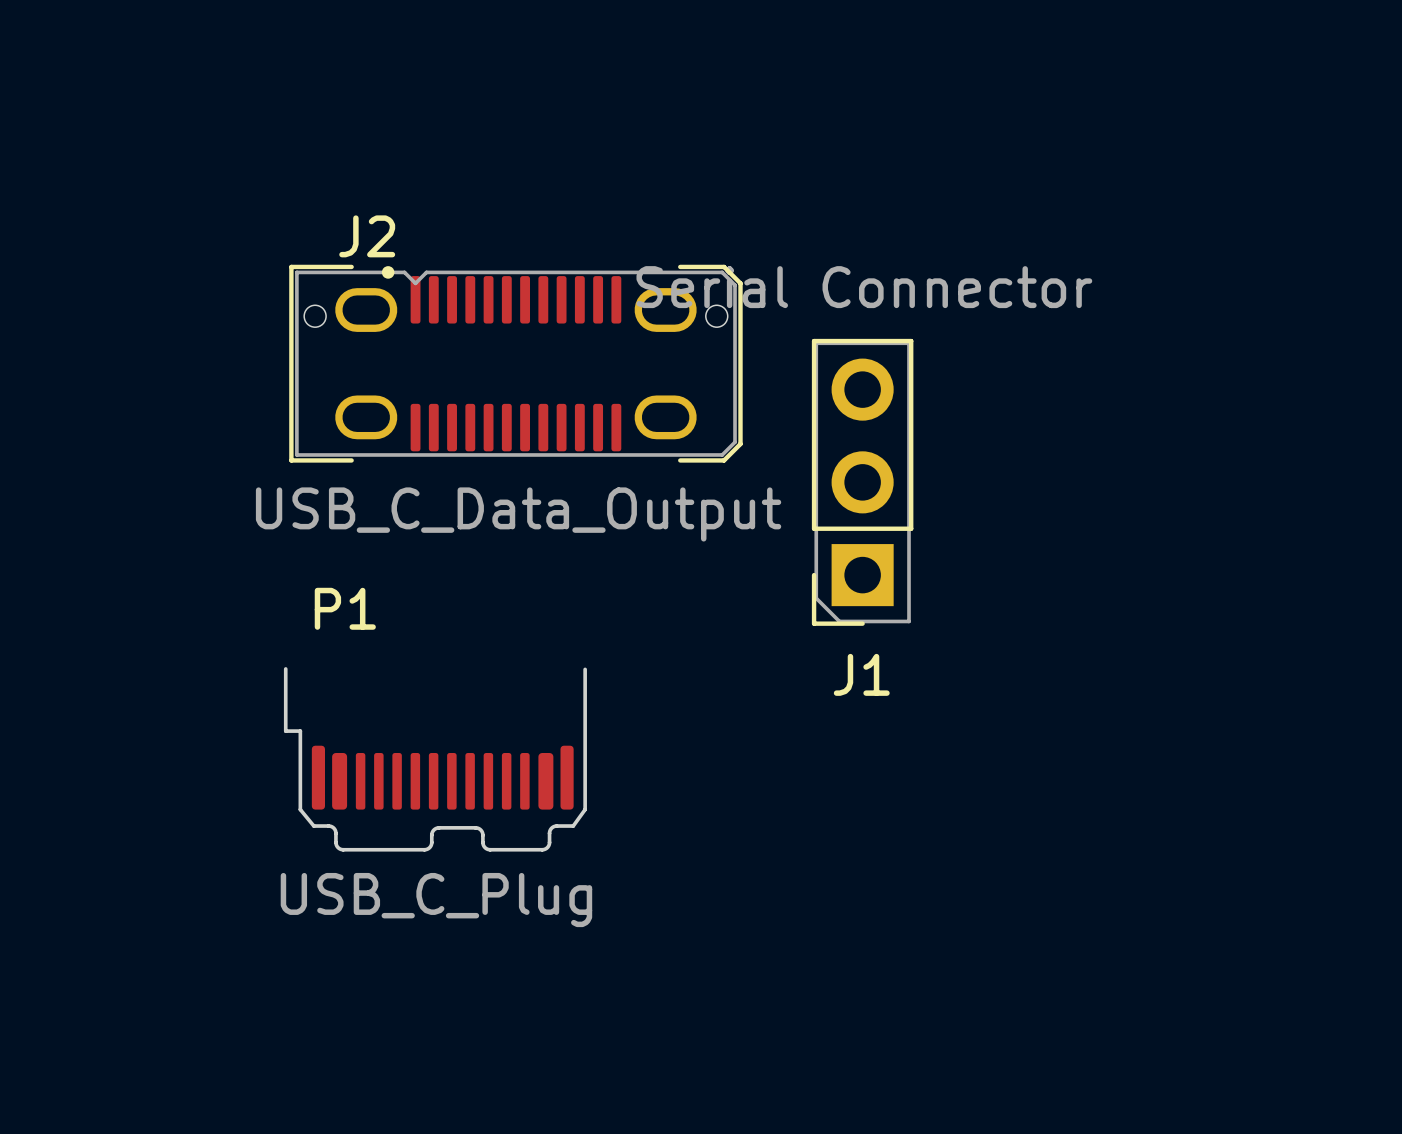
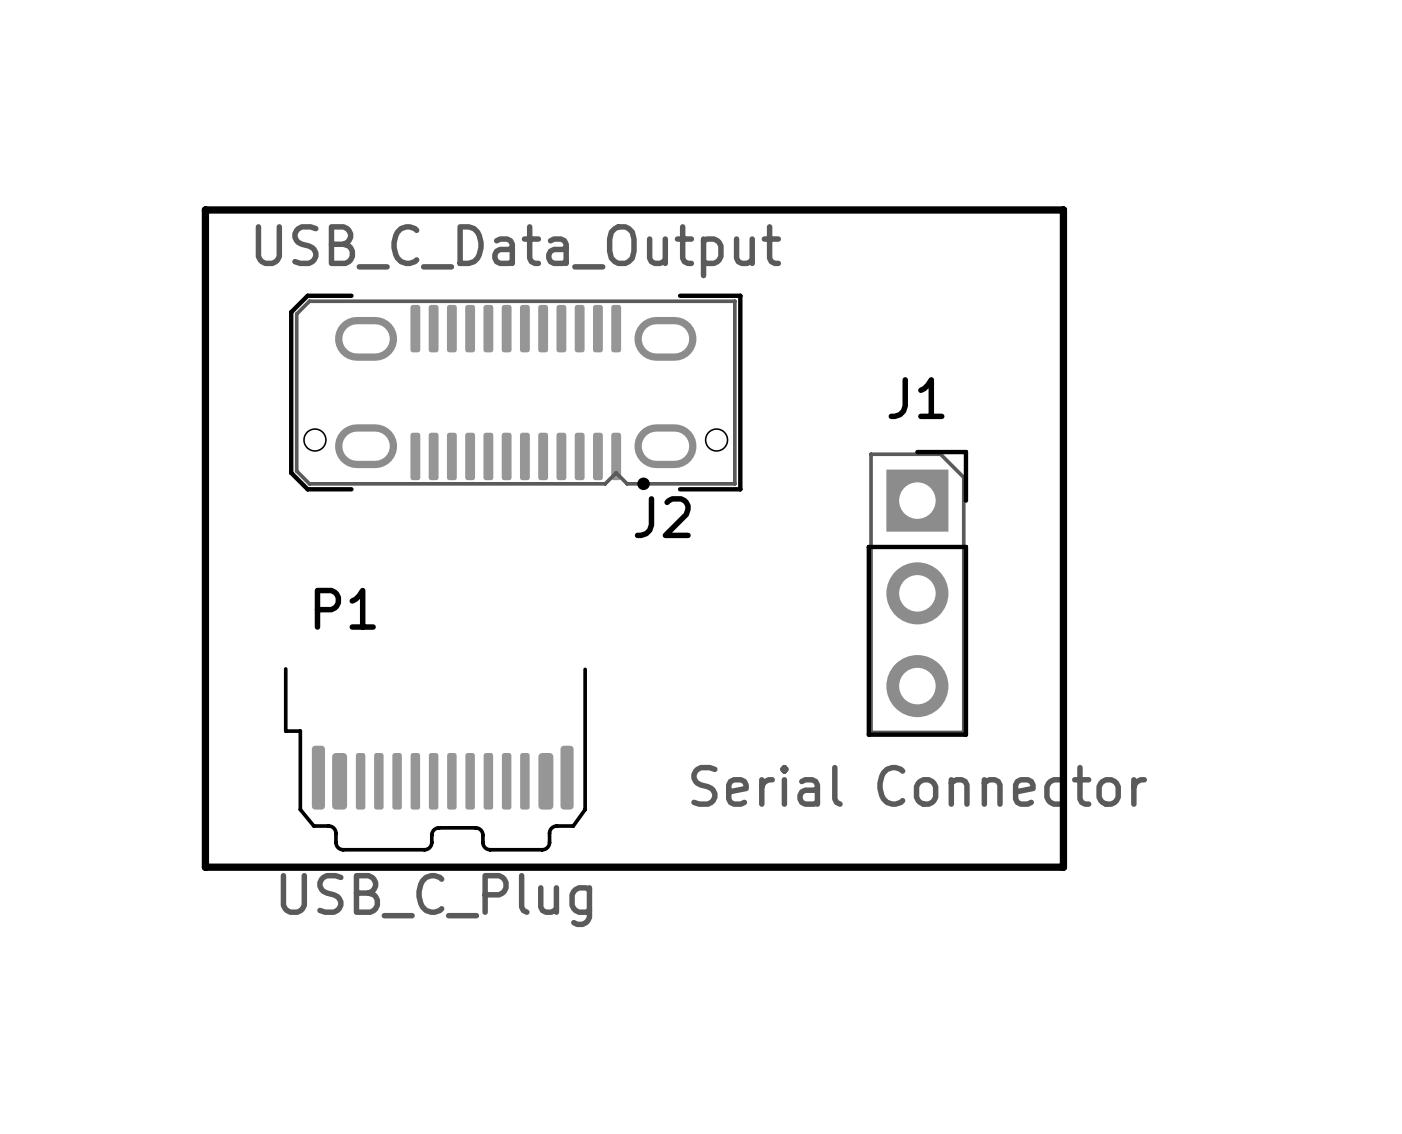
board edge: none -> (205, 209) (1063, 209) (1063, 867) (205, 867) (205, 209)
J2 rotation: 0° (515, 363) -> 180° (515, 392)
J1 rotation: 0° (862, 482) -> 180° (917, 593)

